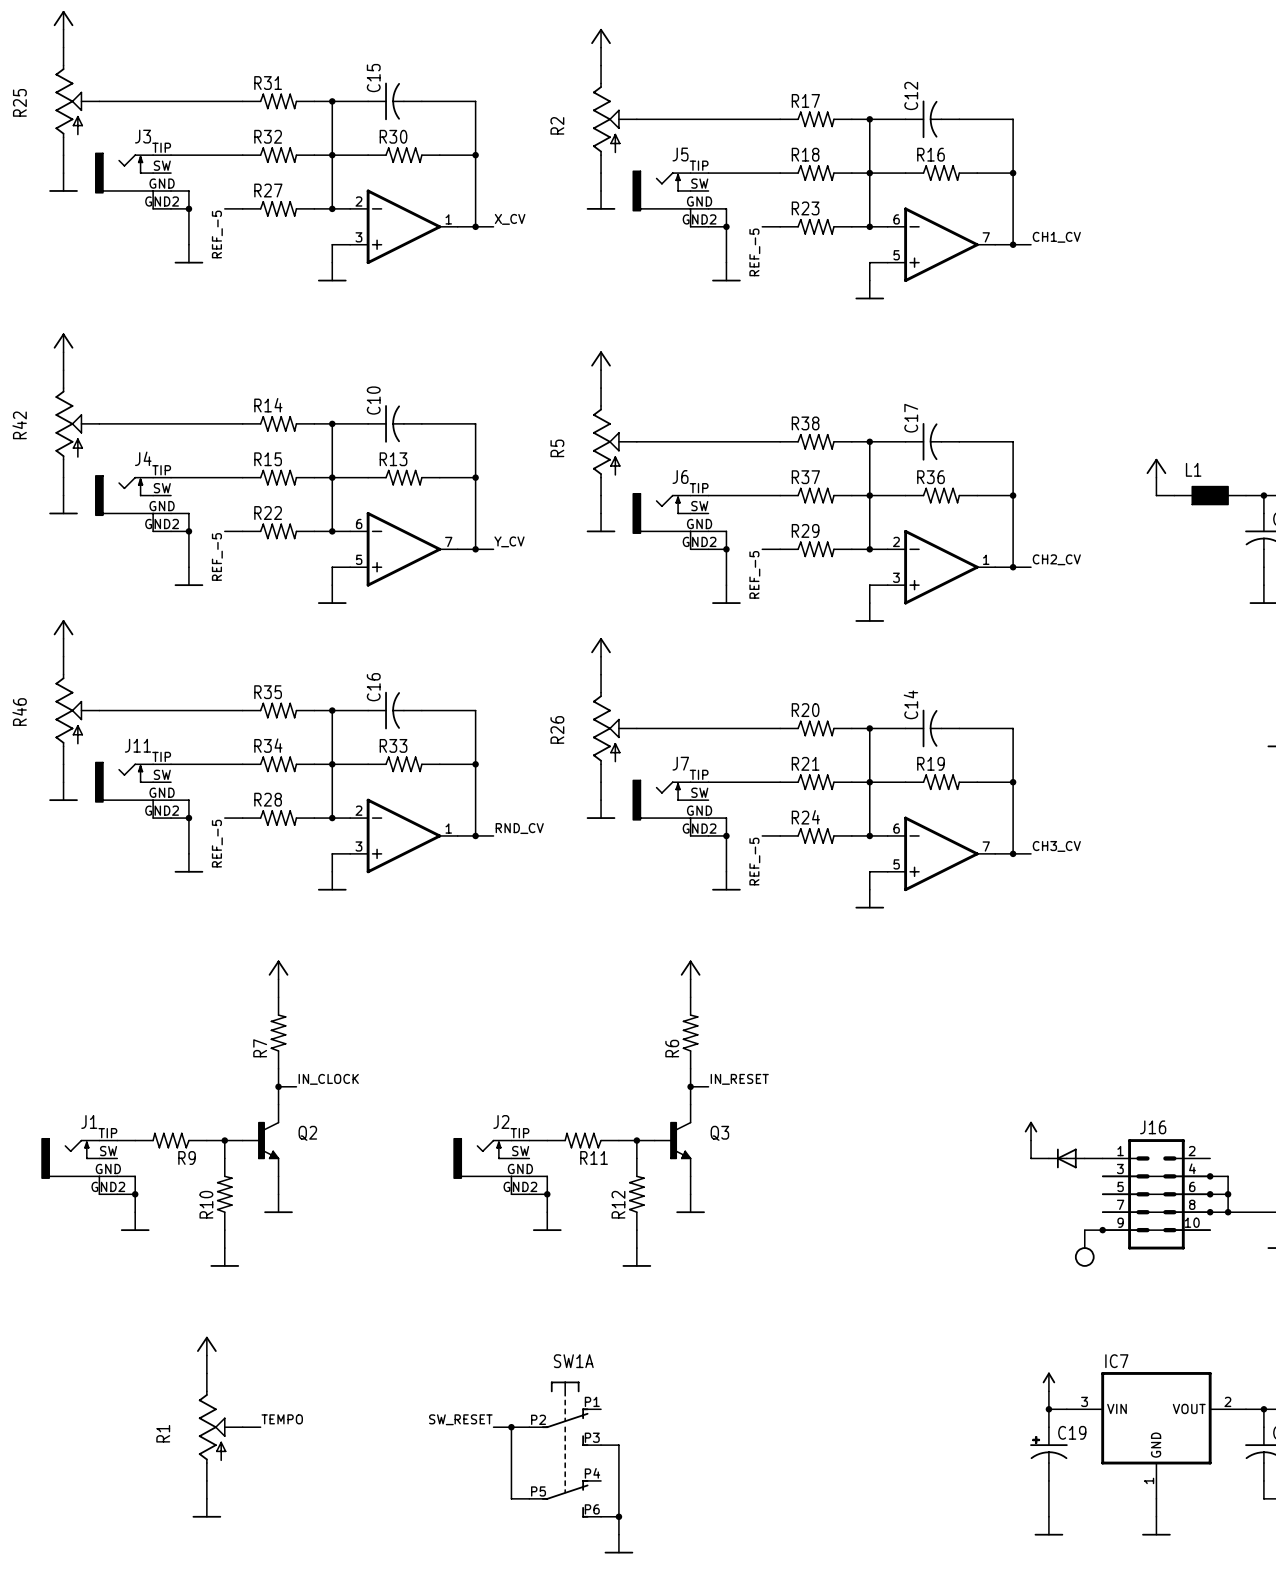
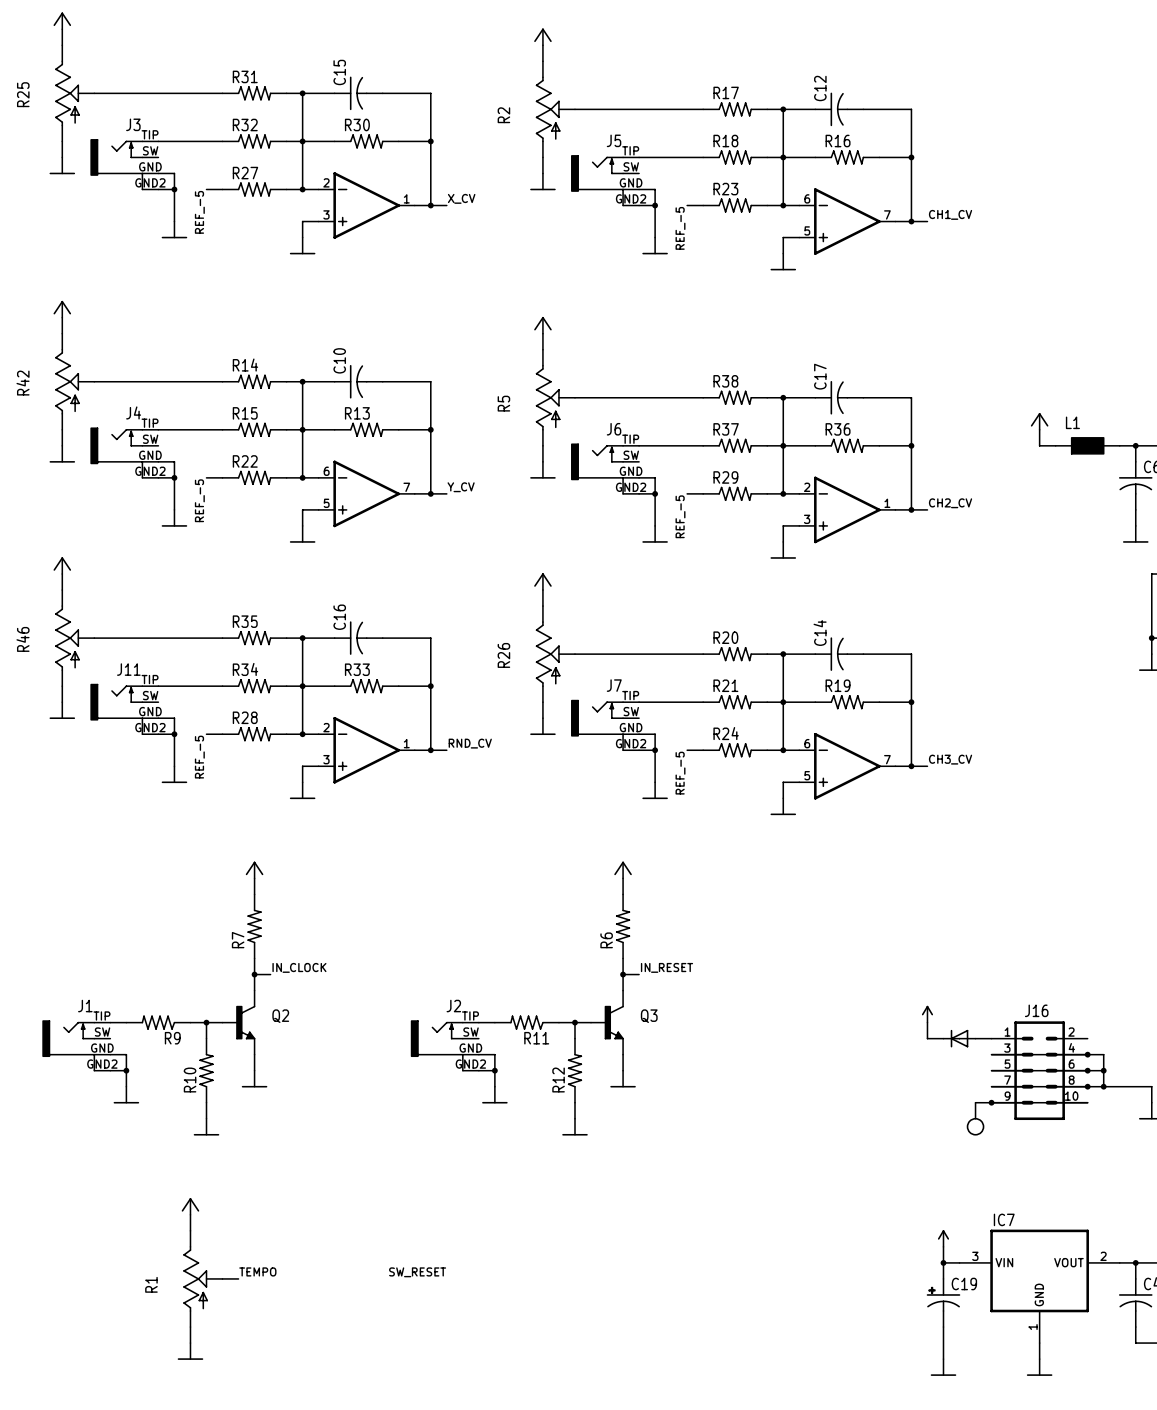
wire: (493, 1427) (529, 1427) -> none
wire: (511, 1427) (511, 1498) (529, 1498) -> none
junction: (511, 1427) -> none
wire: (601, 1445) (618, 1445) (618, 1534) -> none
SW1A: (565, 1449) -> none
wire: (601, 1516) (618, 1516) -> none
junction: (618, 1516) -> none
power symbol: (618, 1544) -> none

